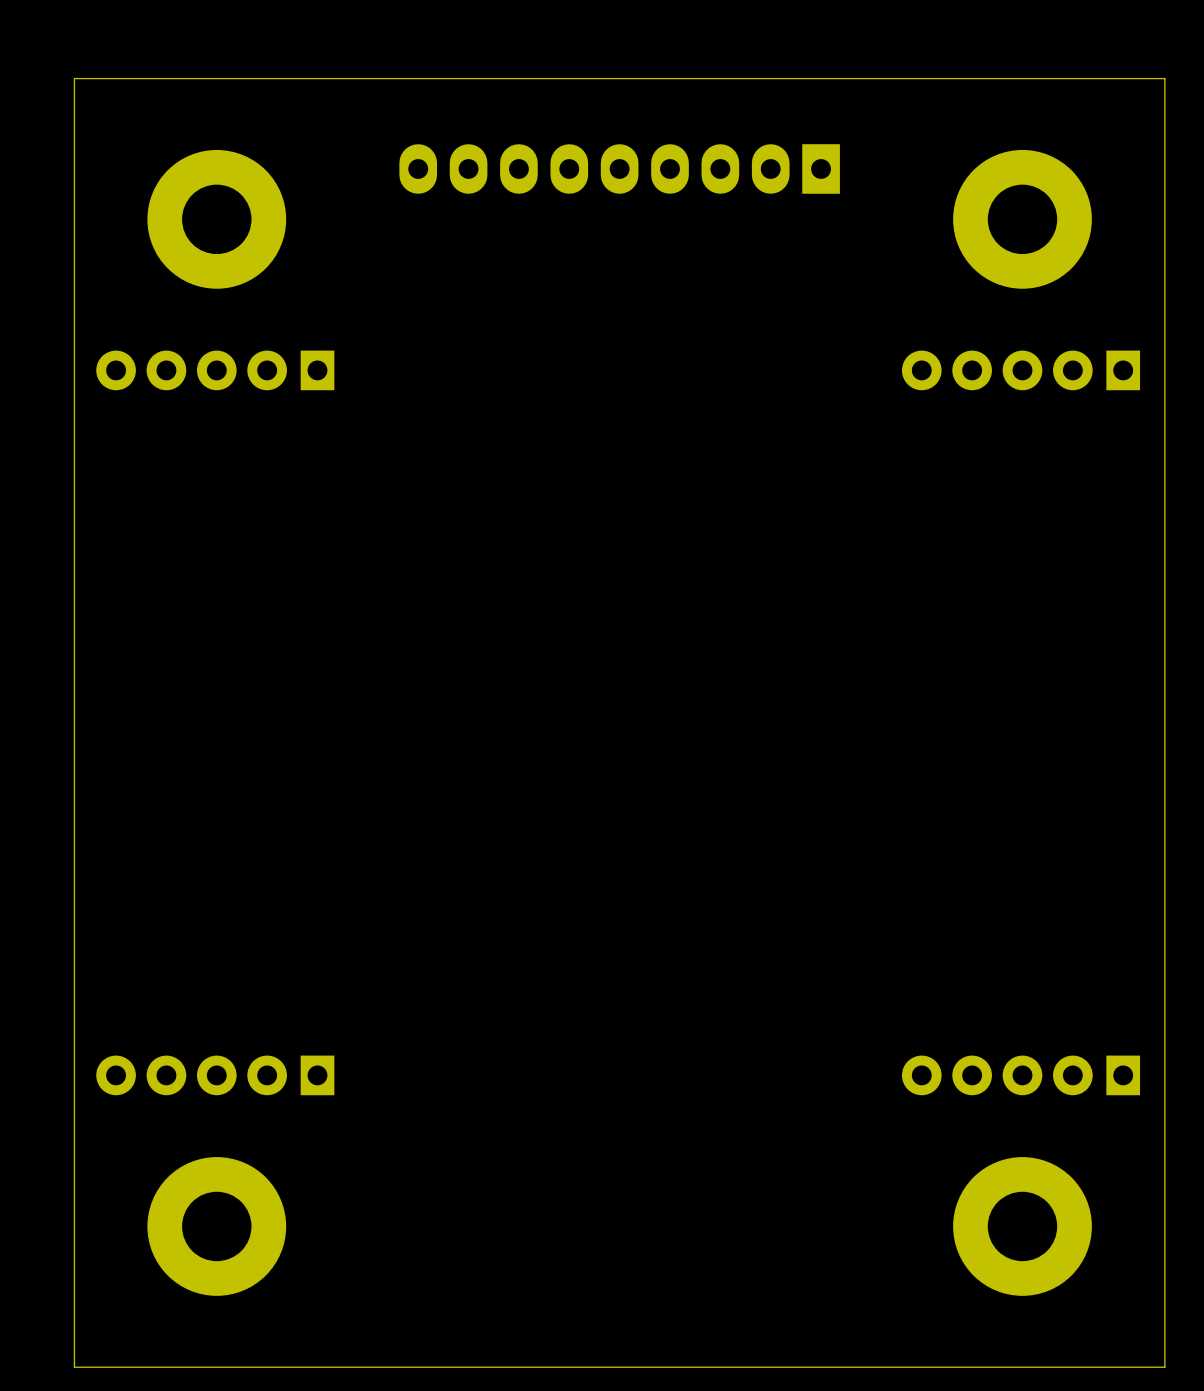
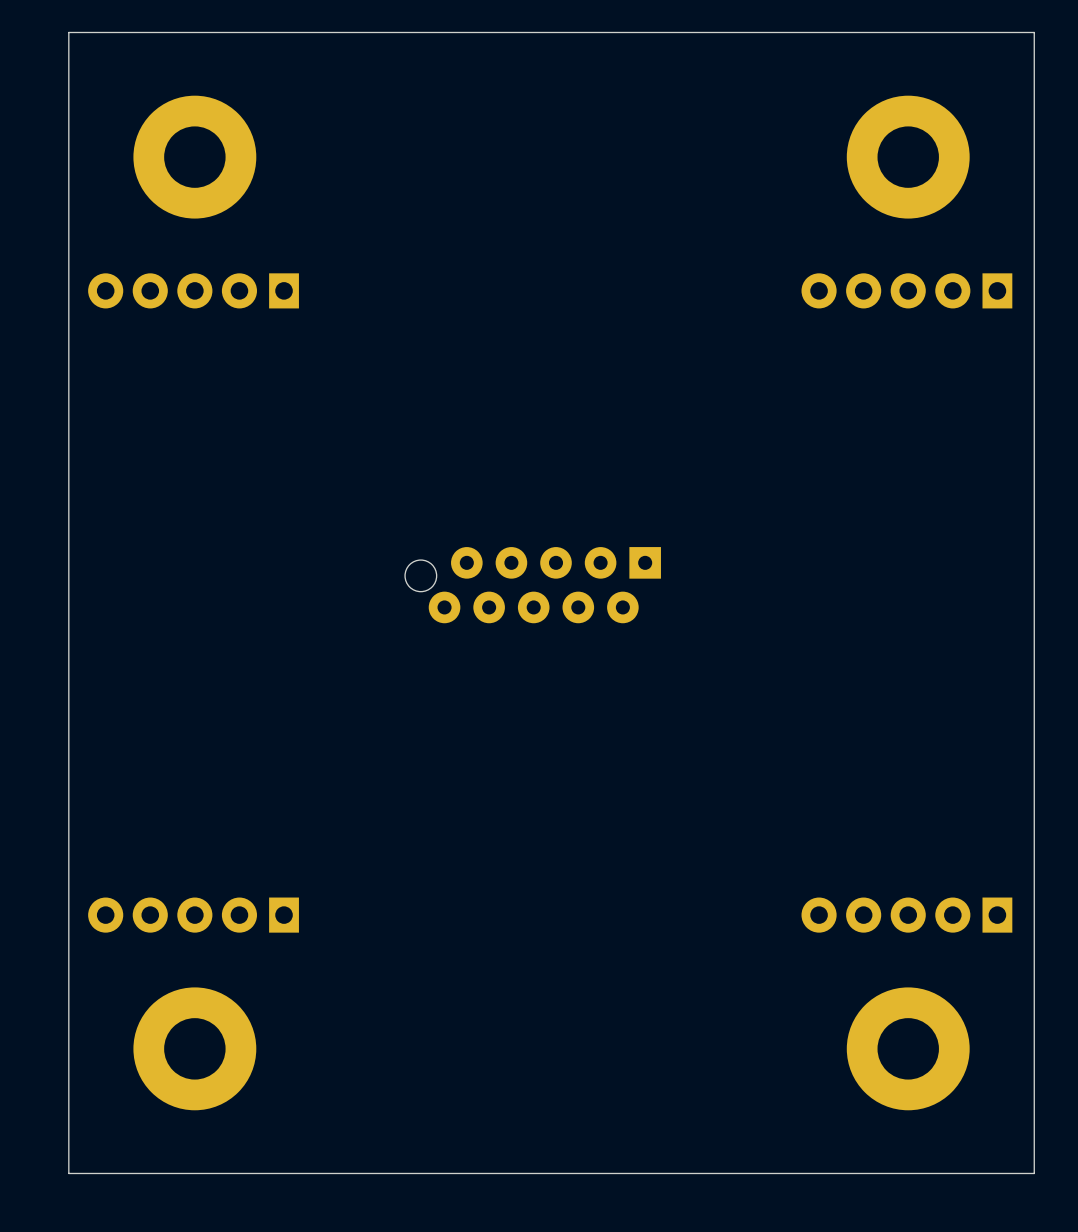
part: (619, 168) -> none
part: none -> (533, 585)

